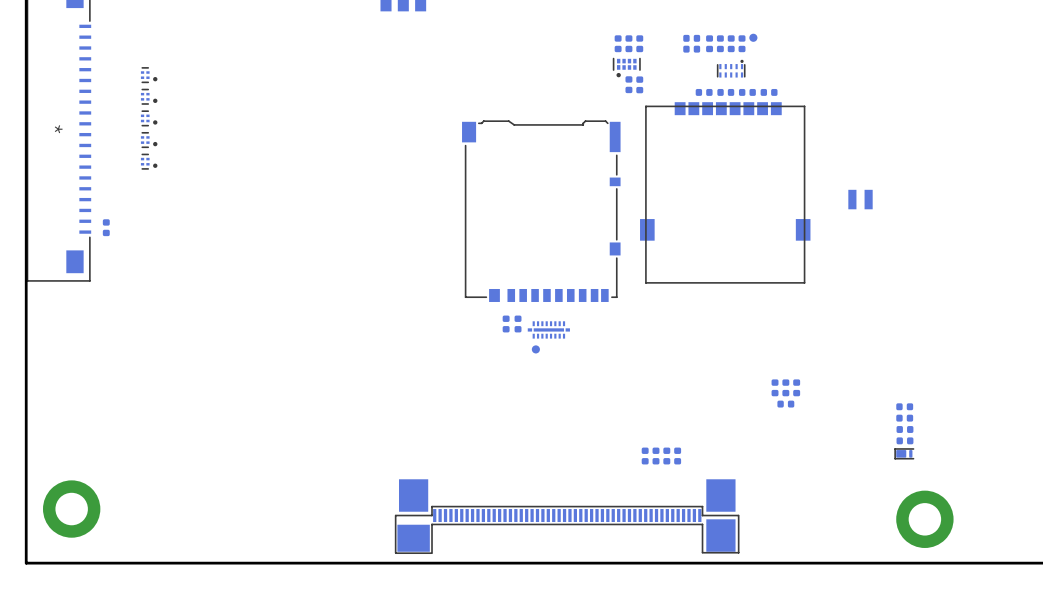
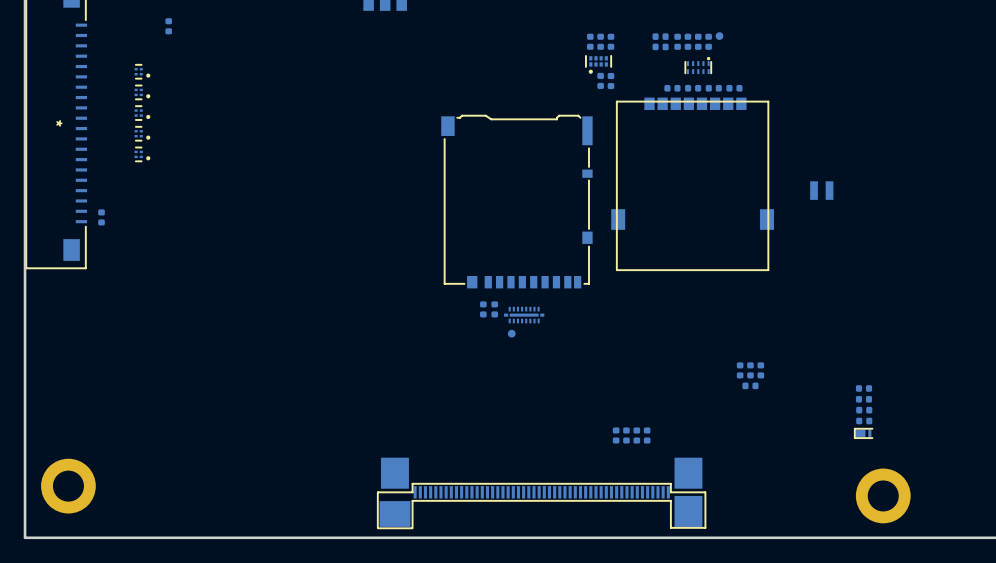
part: none -> (168, 26)

